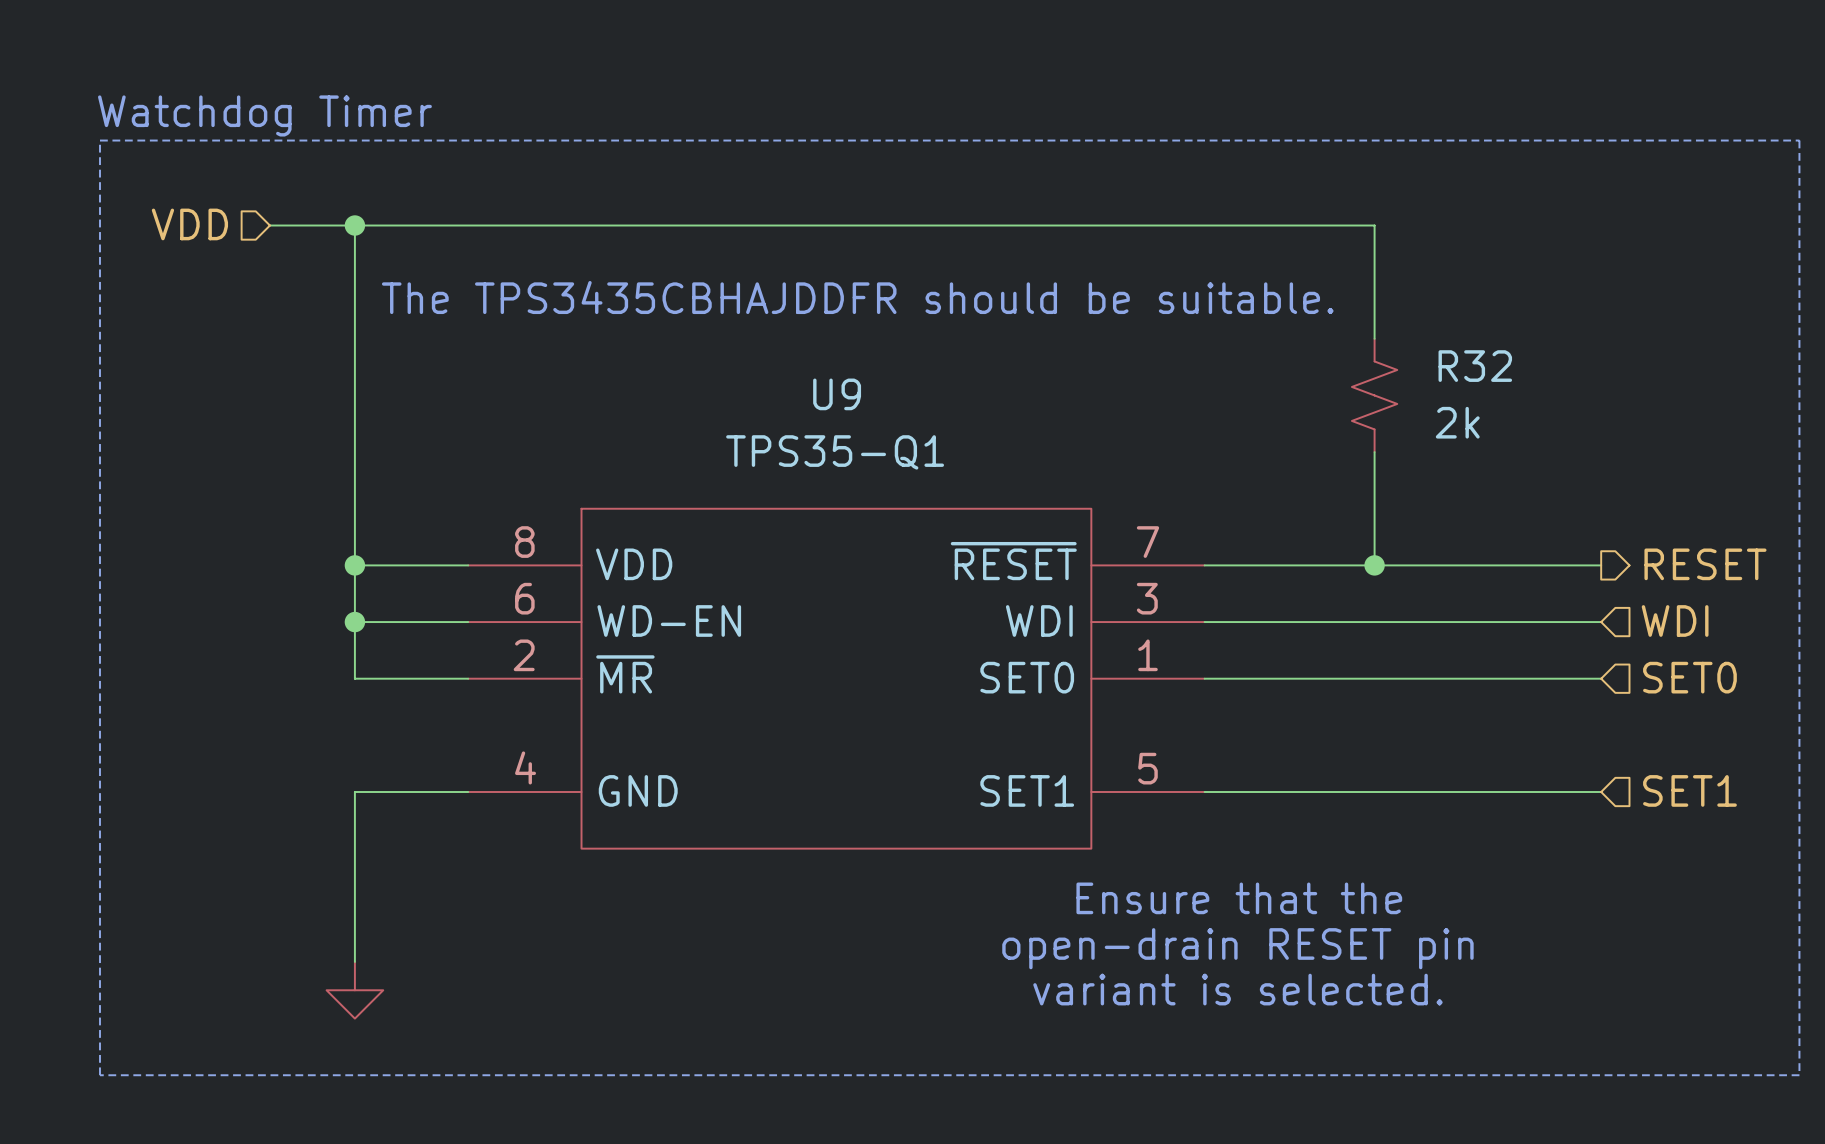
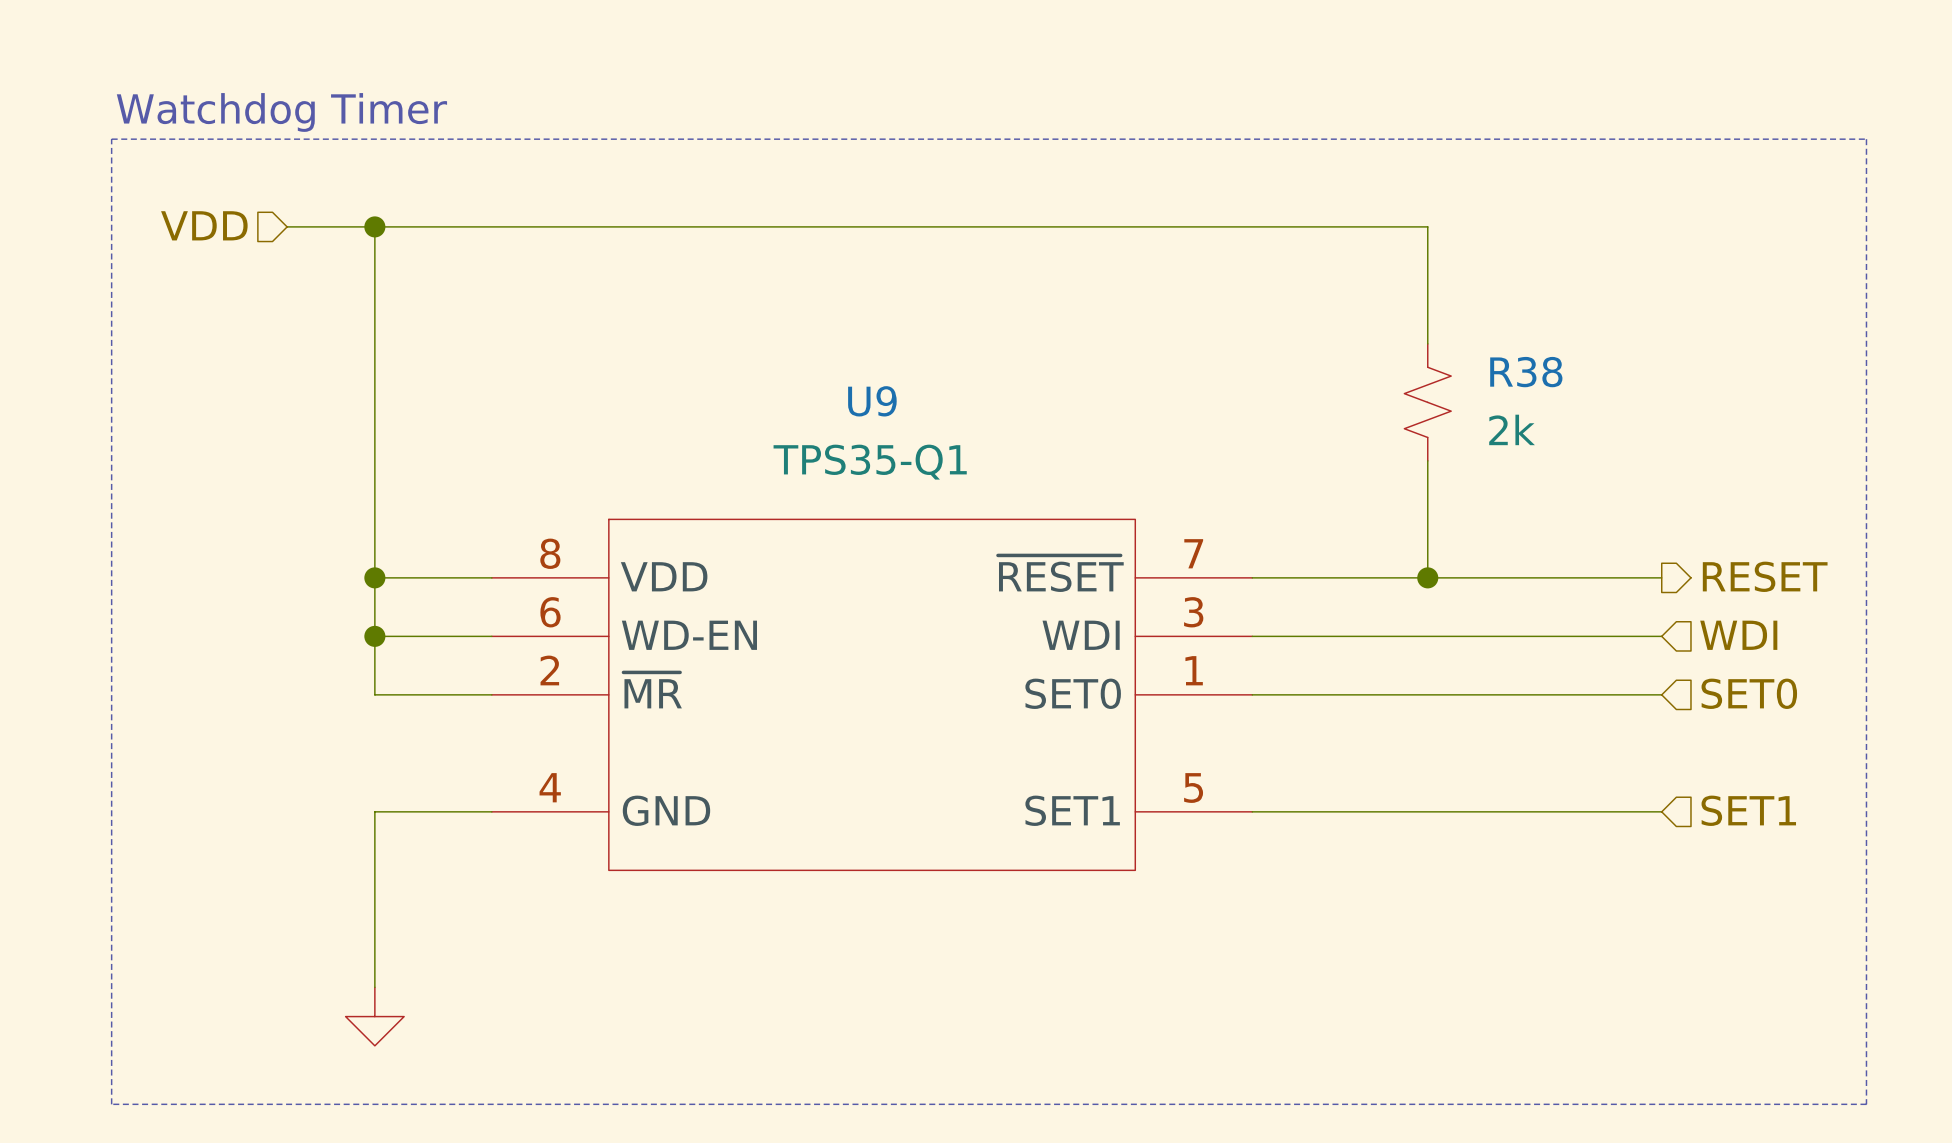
text: The TPS3435CBHAJDDFR should be suitable. (857, 297) -> none
R32 name: R32 (1475, 366) -> R38 (1526, 372)
text: Ensure that the (1239, 898) -> none
text: open-drain RESET pin (1237, 948) -> none
text: variant is selected. (1237, 989) -> none

